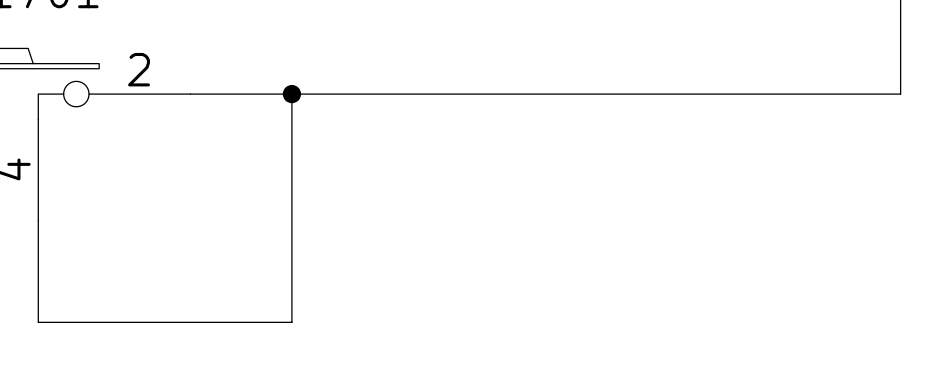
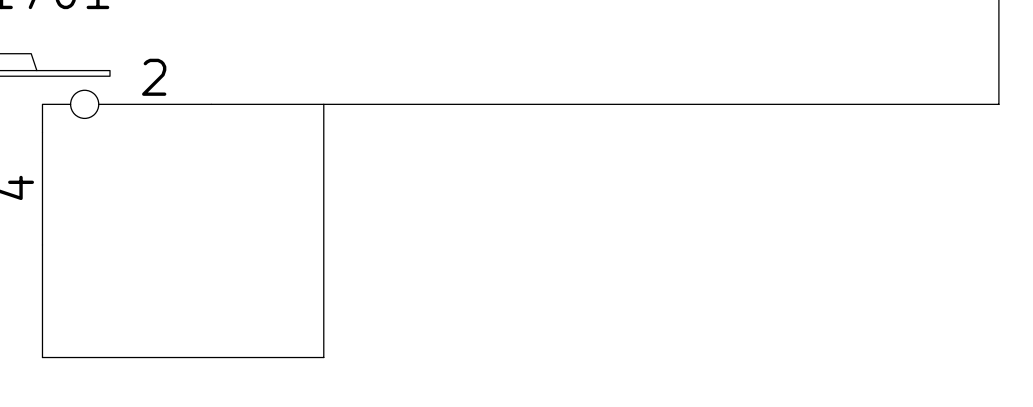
junction: (291, 94) -> none

